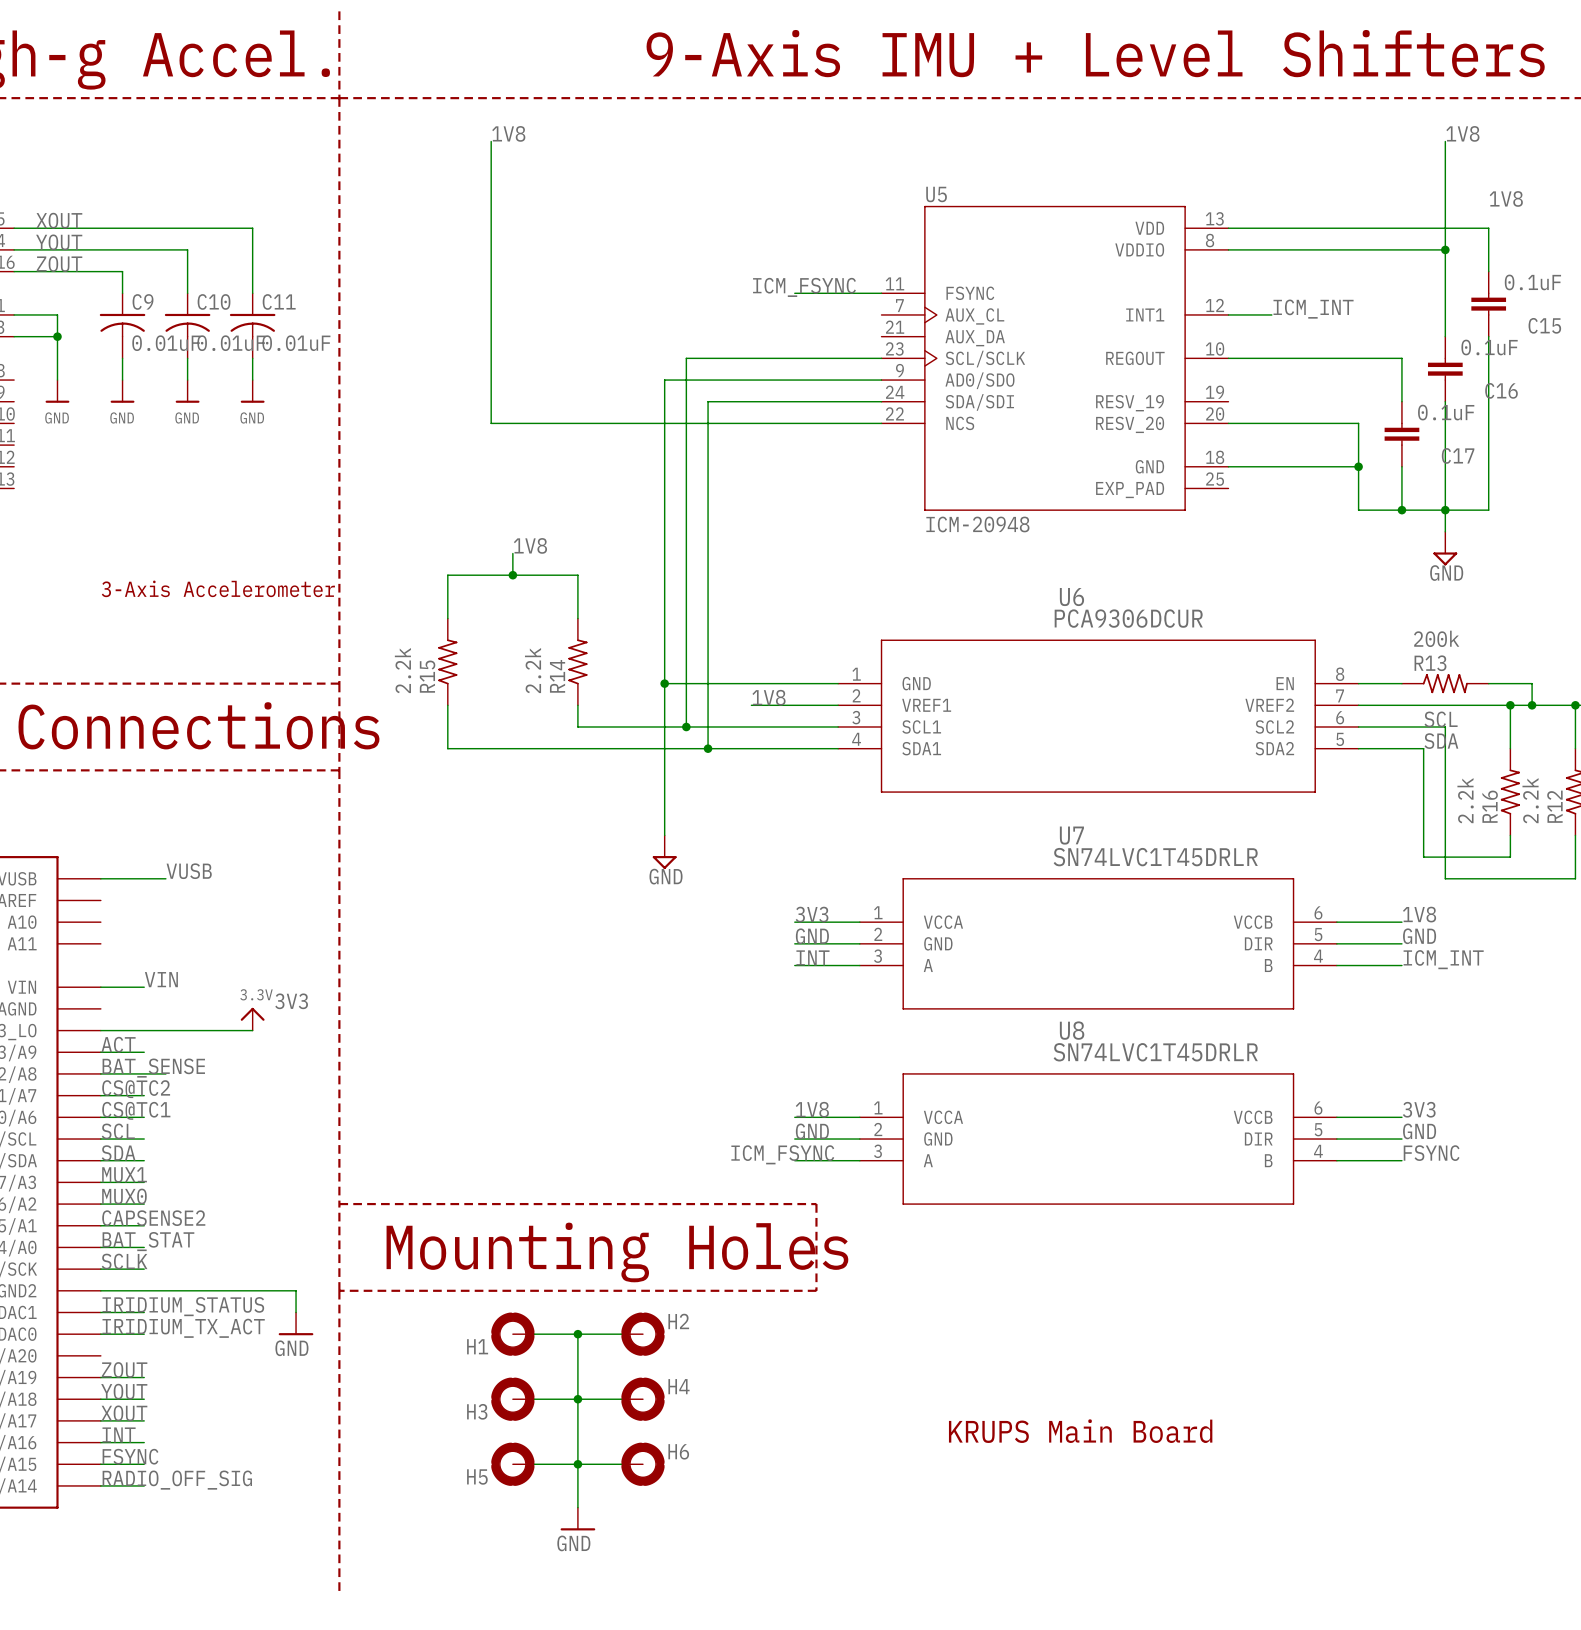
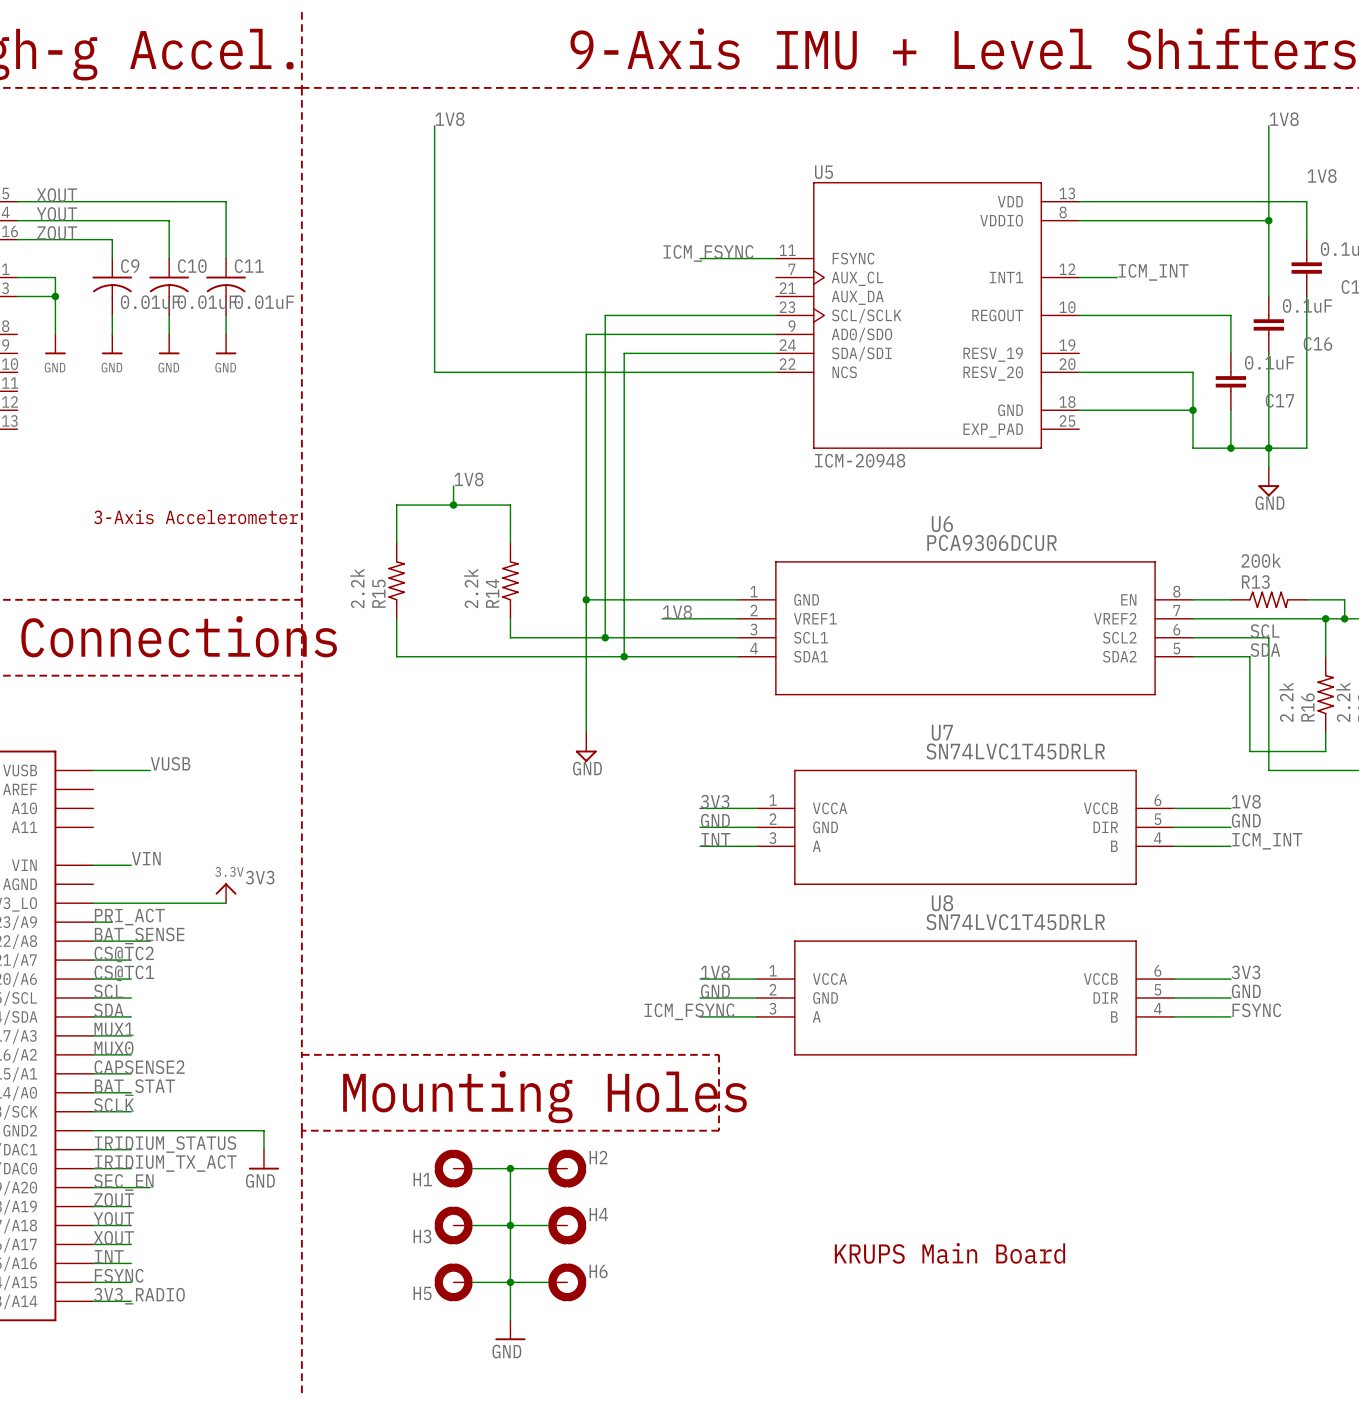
label: ACT (118, 1044) -> PRI_ACT (129, 917)
wire: (122, 1052) (144, 1052) -> none
label: none -> SEC_EN (123, 1182)
wire: none -> (93, 1187) (150, 1187)
label: RADIO_OFF_SIG (177, 1480) -> 3V3_RADIO (139, 1296)

